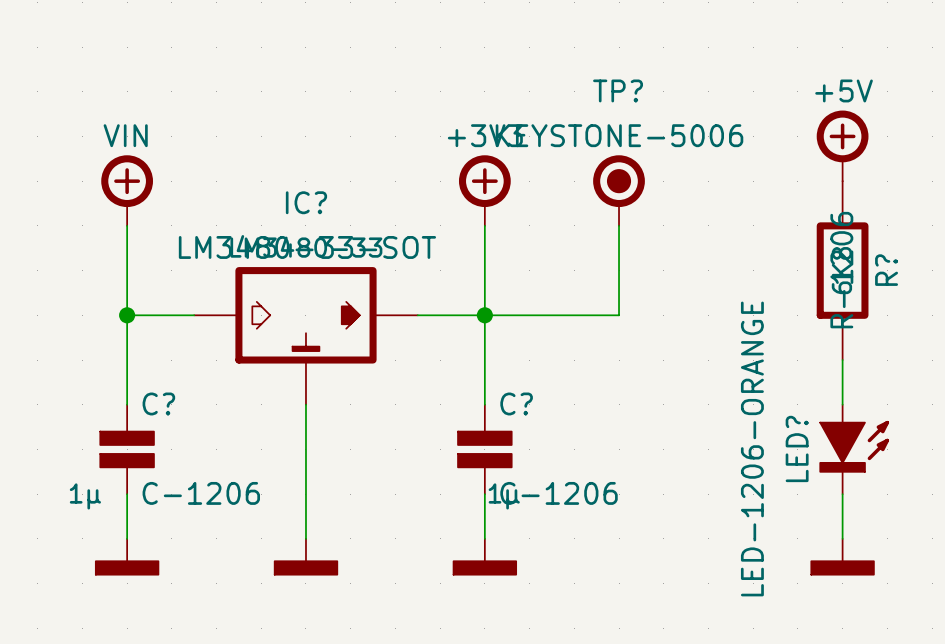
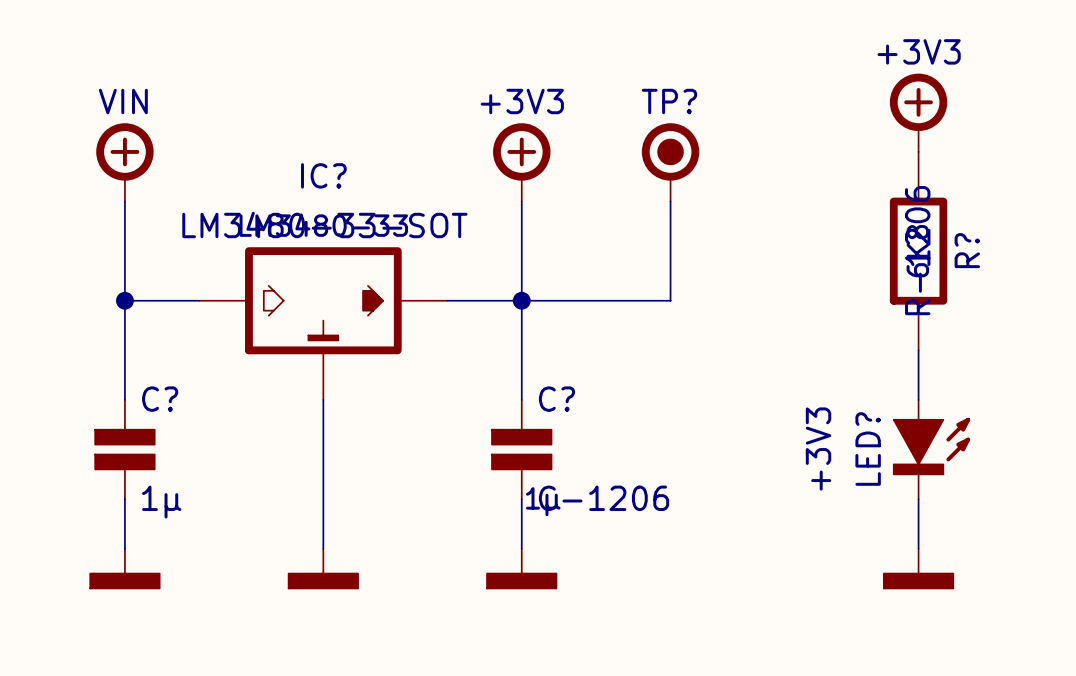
TP? name position: TP? (618, 90) -> TP? (669, 101)
power symbol text: +5V (844, 90) -> +3V3 (919, 51)
TP? value: KEYSTONE-5006 (619, 135) -> none
LED? value: LED-1206-ORANGE (752, 448) -> +3V3 (818, 449)
C? value: C-1206 (201, 493) -> 1µ (161, 502)
C? text: 1µ (85, 496) -> none

